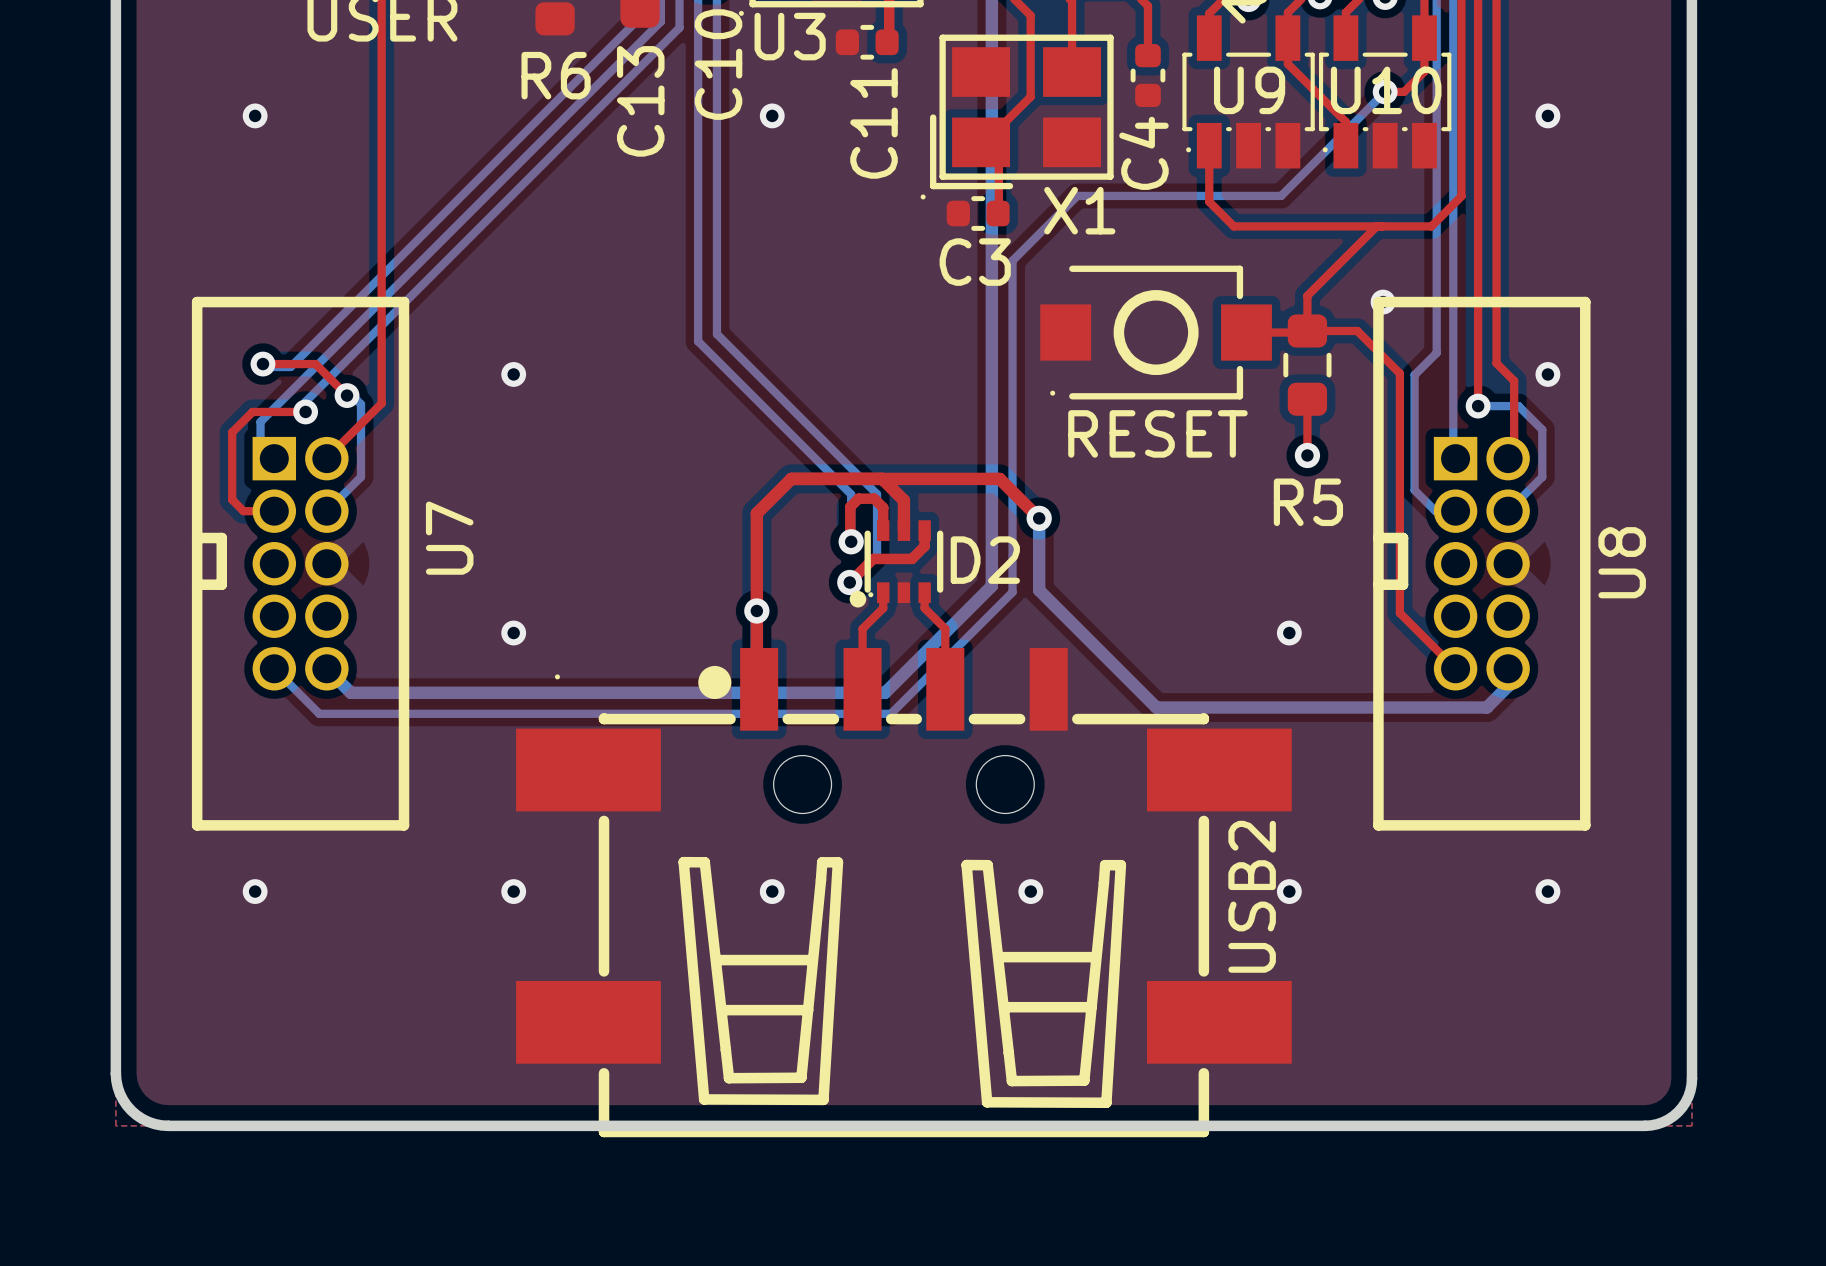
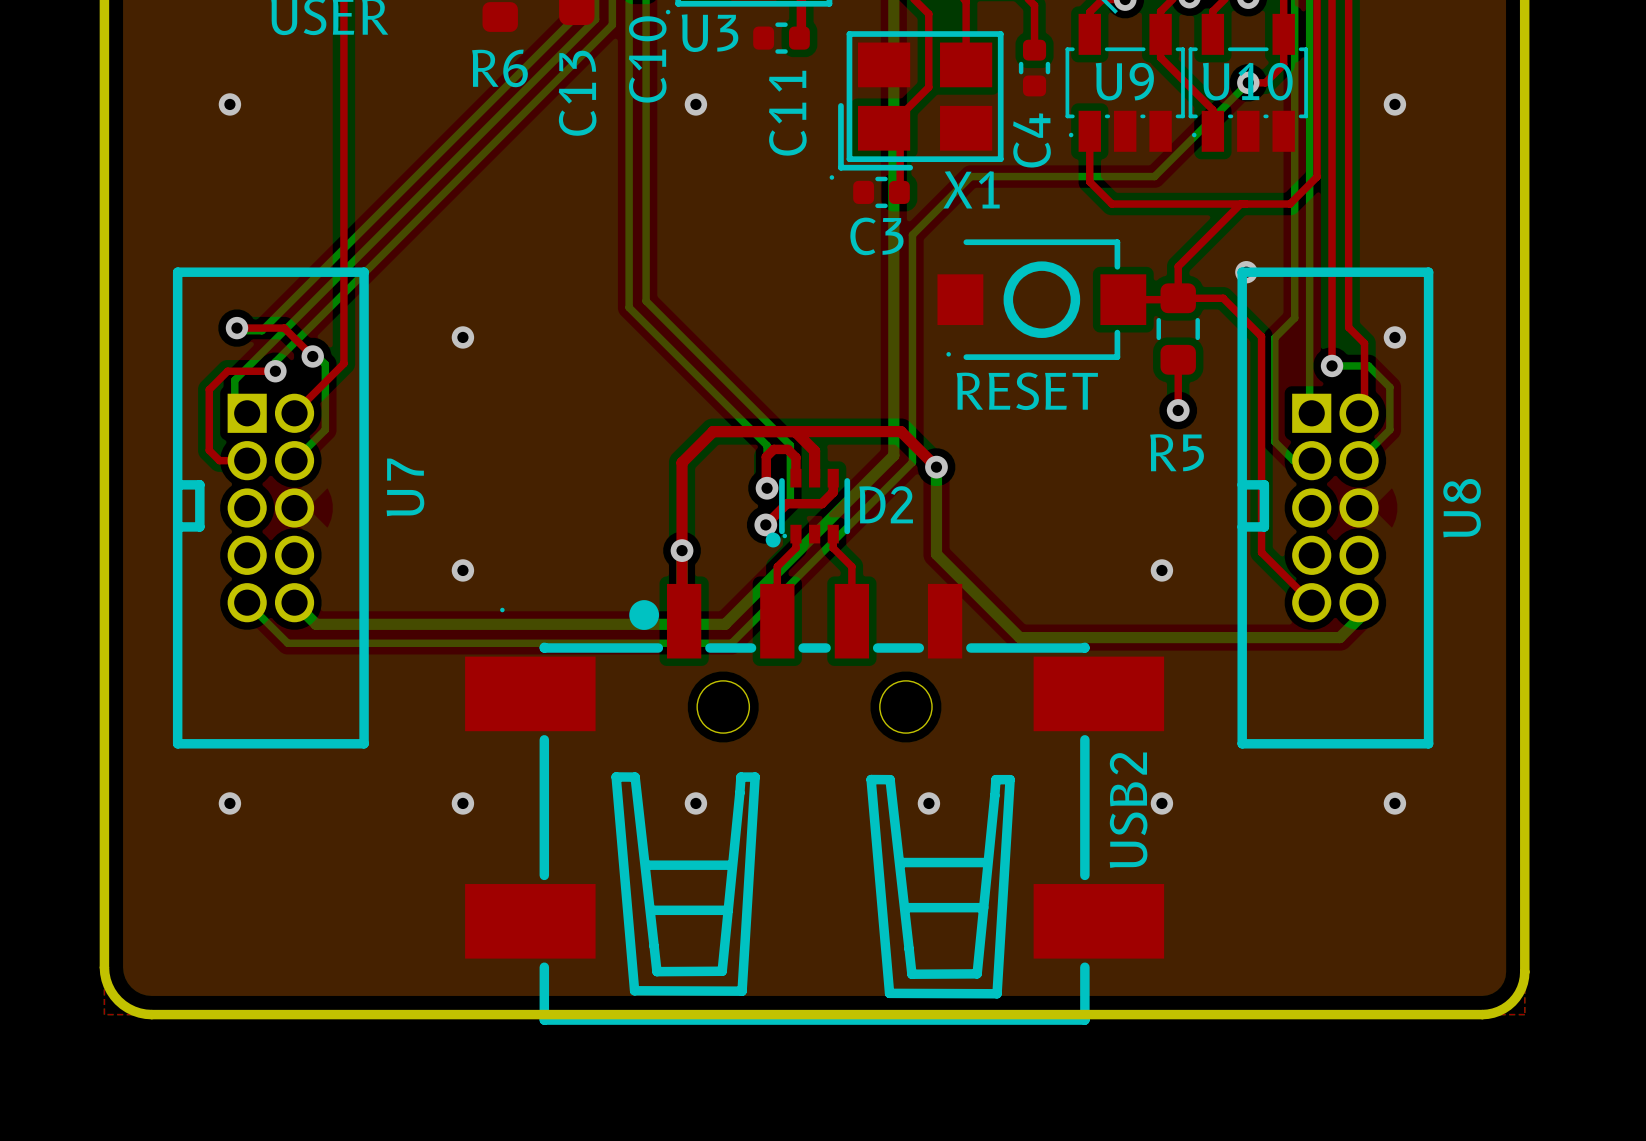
bottom track: (991, 505) (991, 586) (885, 692) (804, 692) -> (893, 455) (725, 624)
bottom track: (1012, 513) (1012, 592) (890, 713) (811, 713) -> (912, 462) (731, 643)
bottom track: (1039, 590) (1156, 707) -> (936, 531) (936, 554) (1019, 637) (1042, 637)

